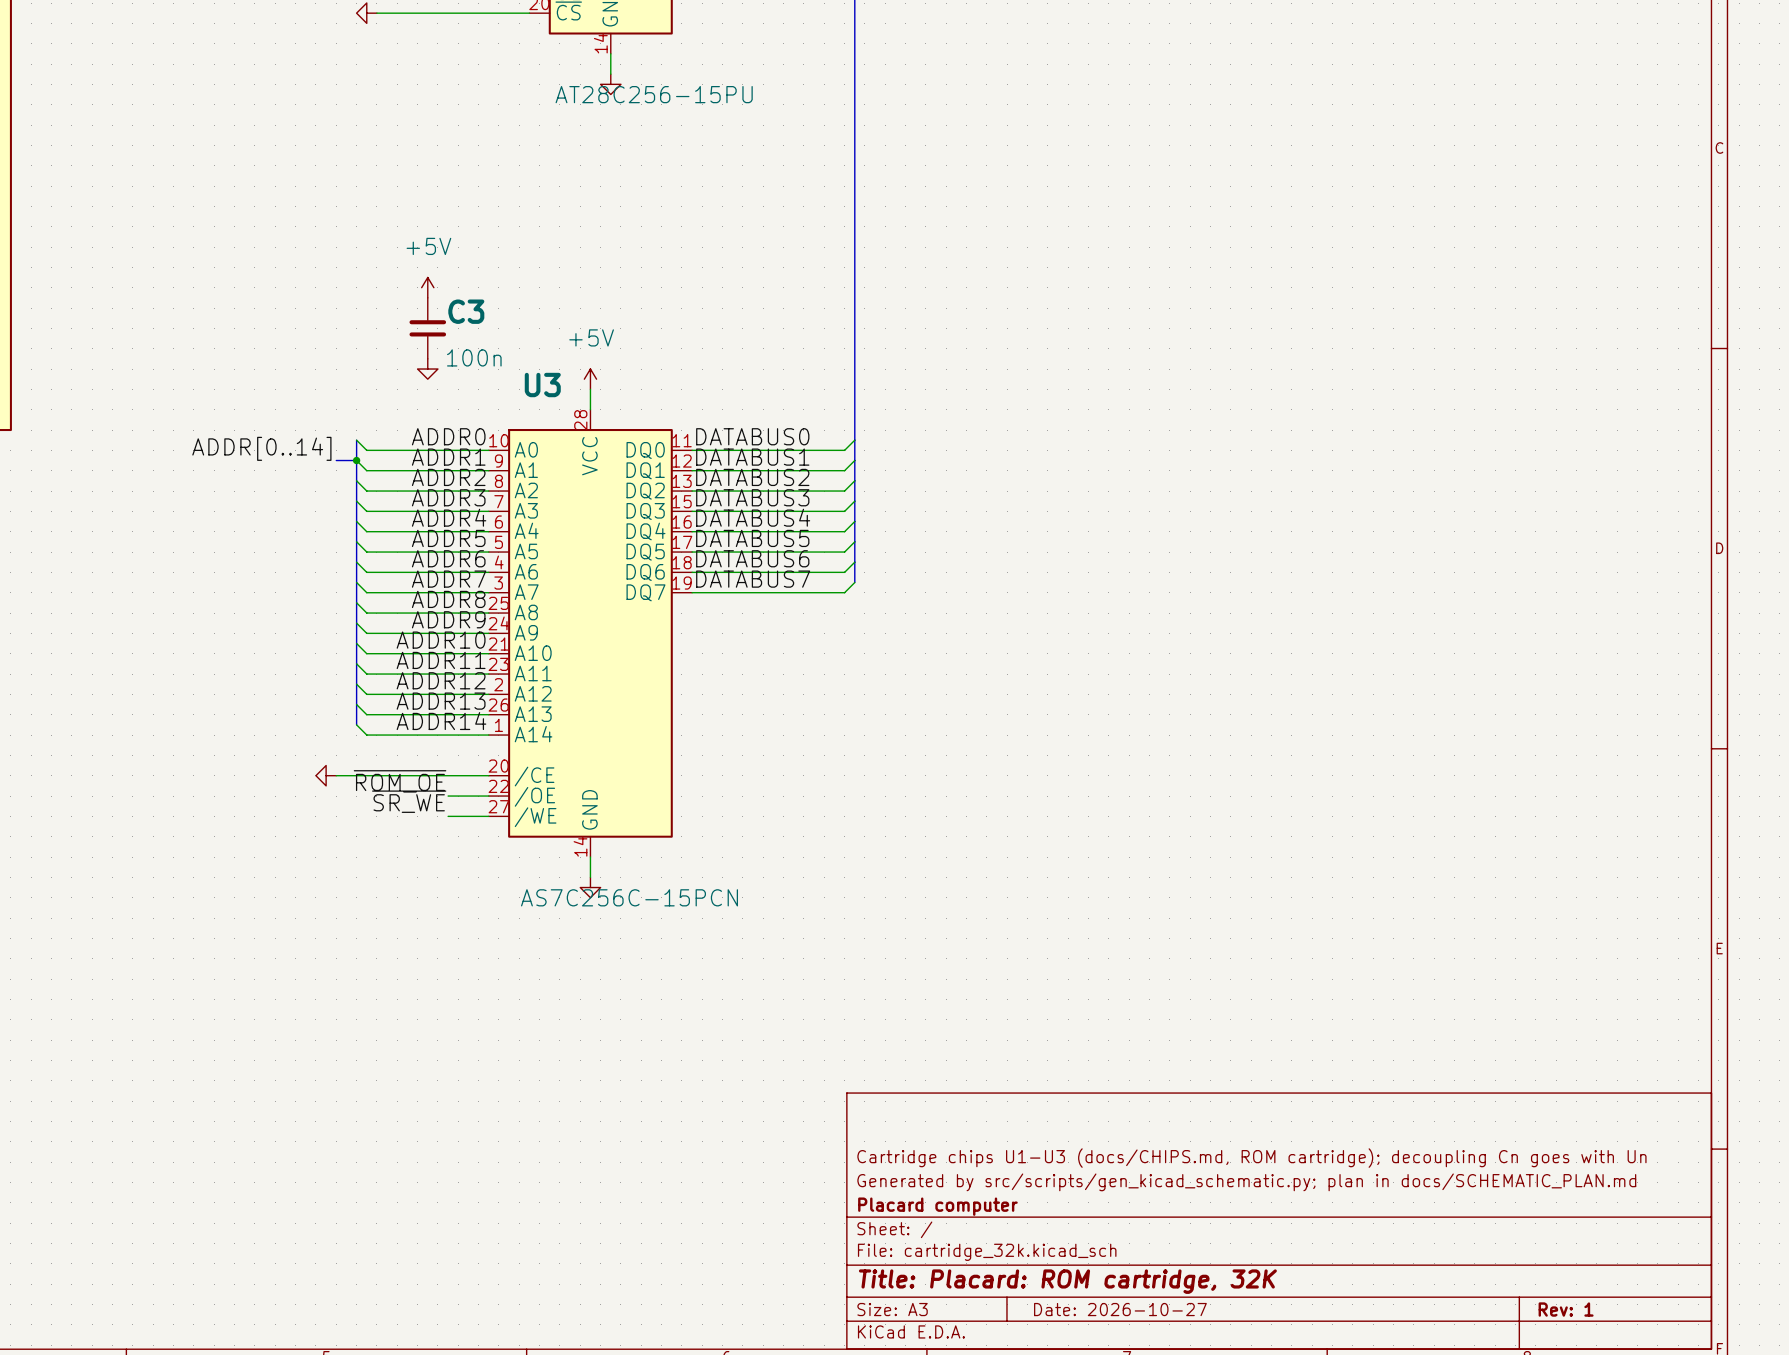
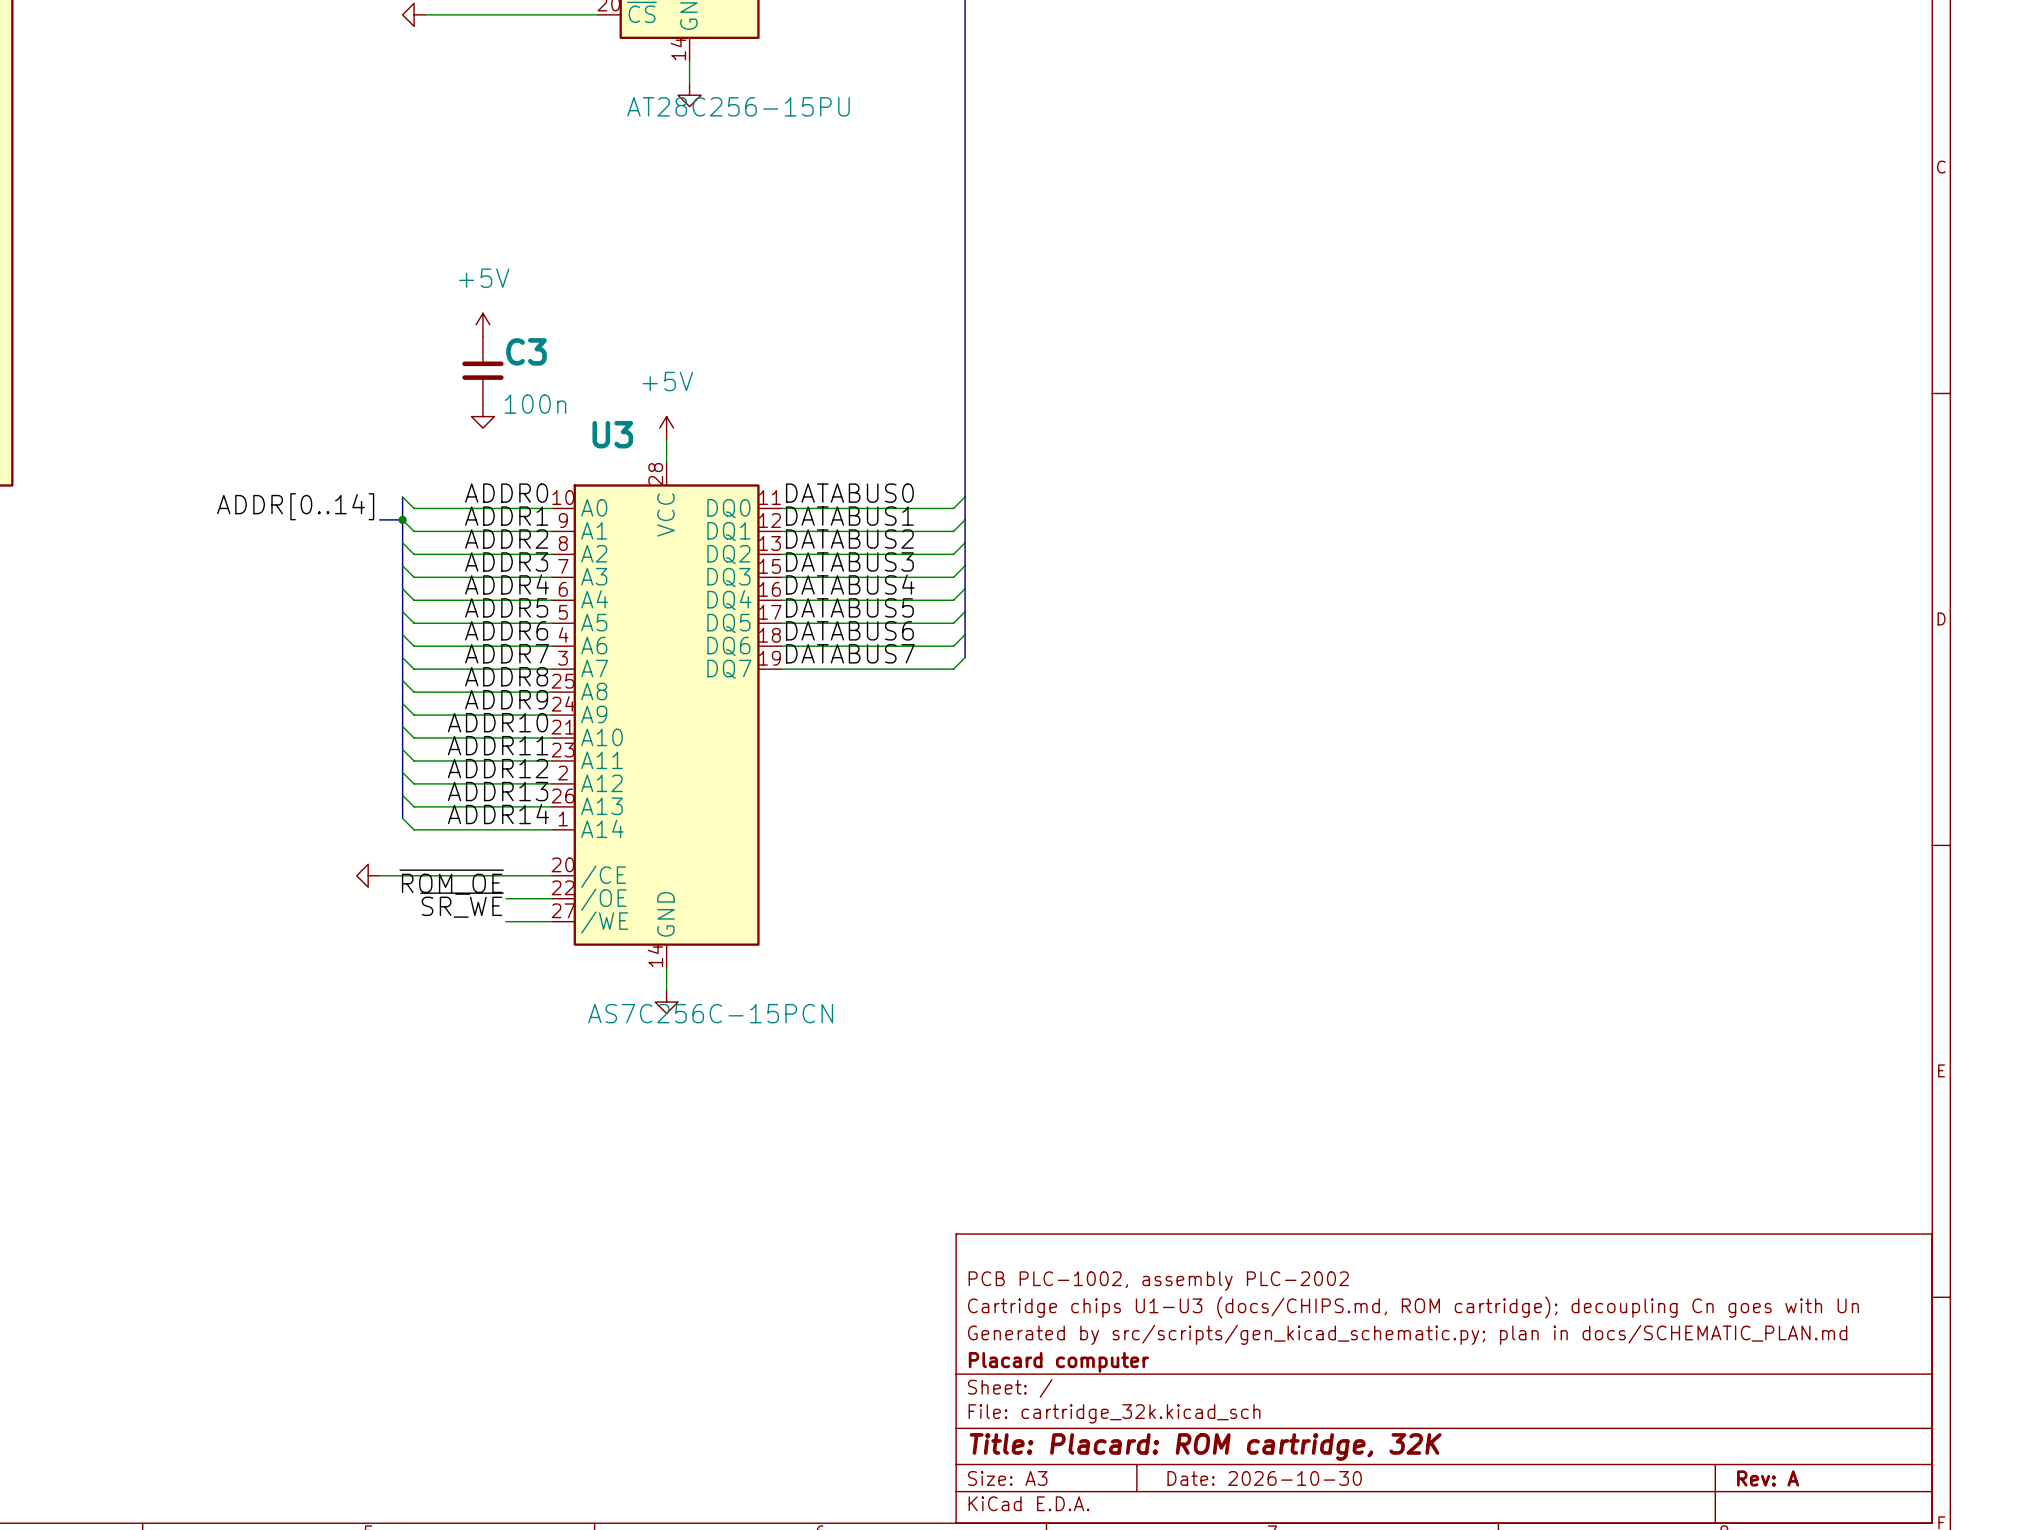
title block: none -> PCB PLC-1002, assembly PLC-2002 (1158, 1280)
title block: Date: 2026-10-27 (1120, 1309) -> Date: 2026-10-30 (1264, 1478)
title block: Rev: 1 (1566, 1309) -> Rev: A (1768, 1478)

